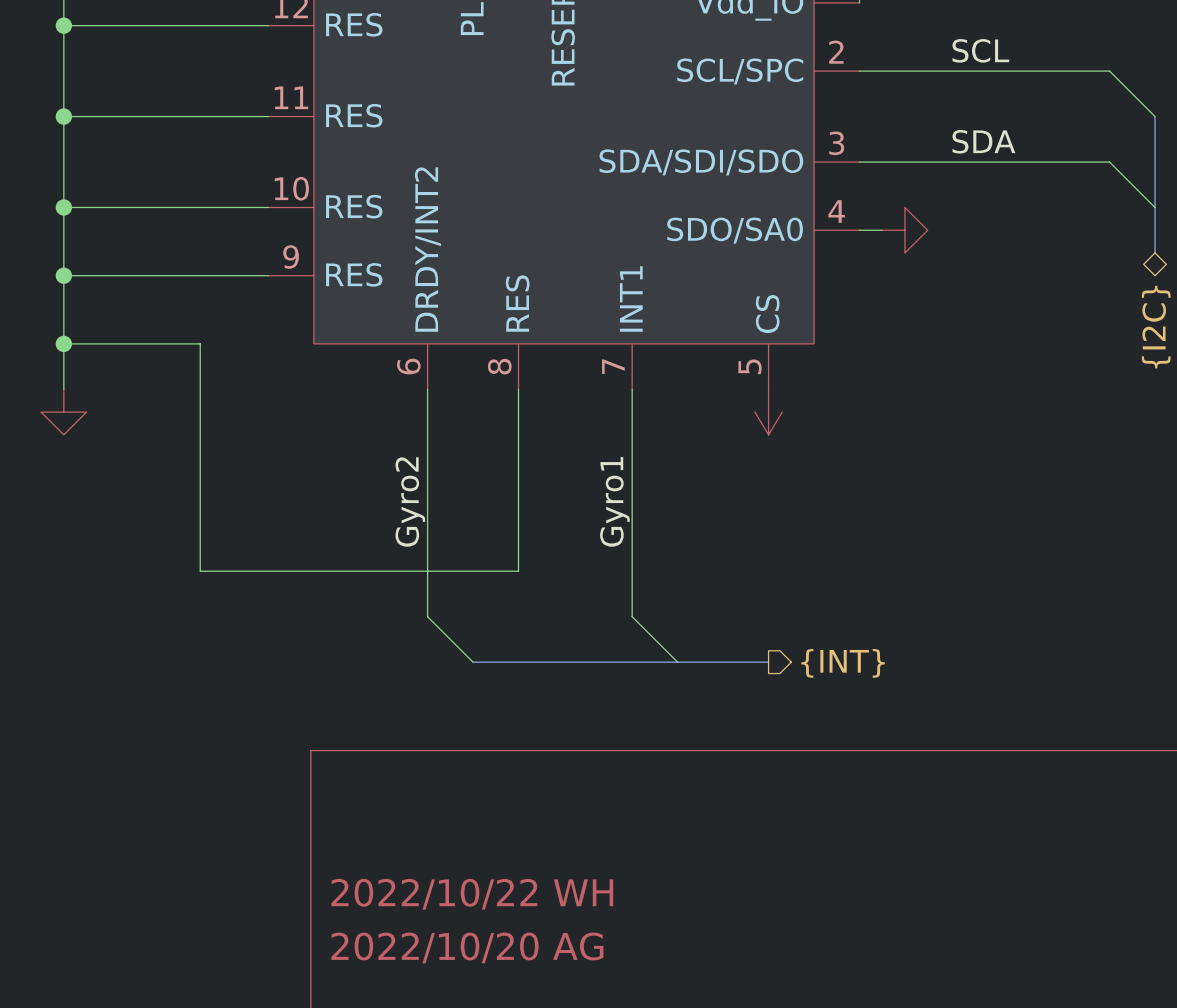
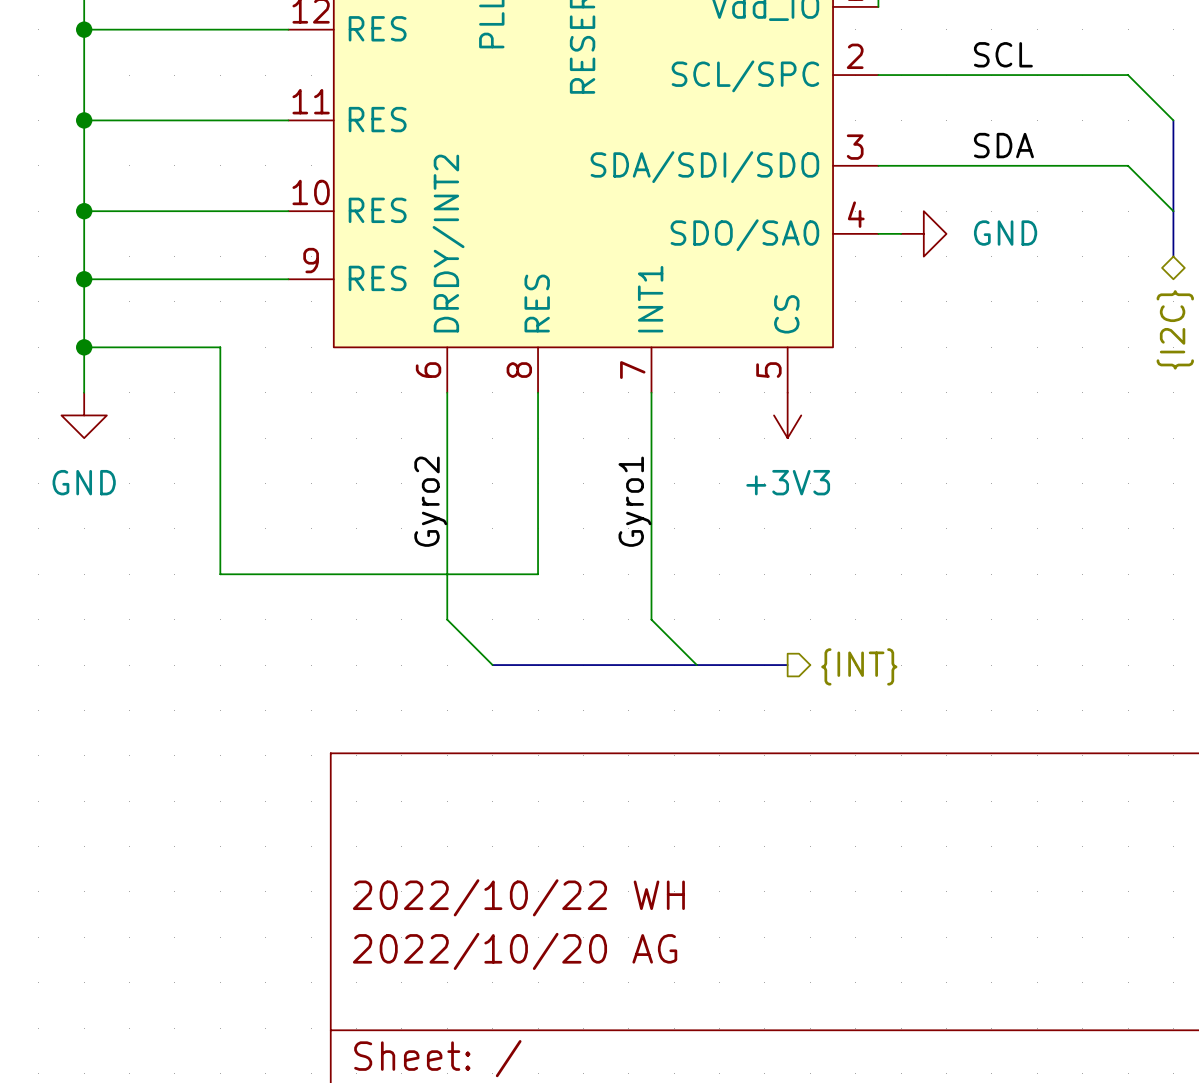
power symbol text: none -> GND (1005, 233)
power symbol text: none -> GND (84, 482)
power symbol text: none -> +3V3 (788, 482)

